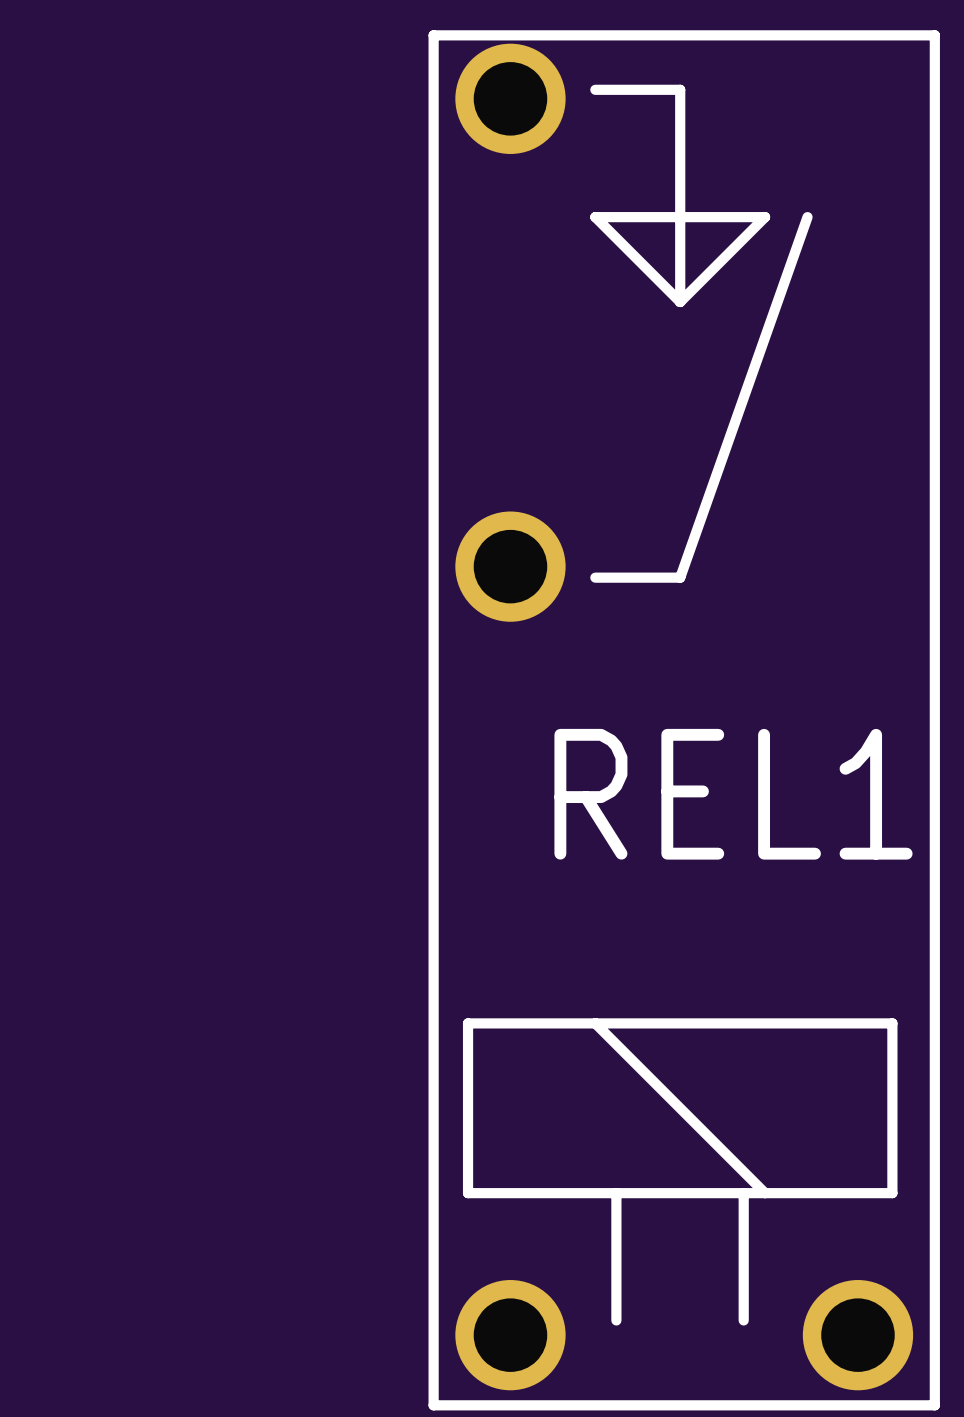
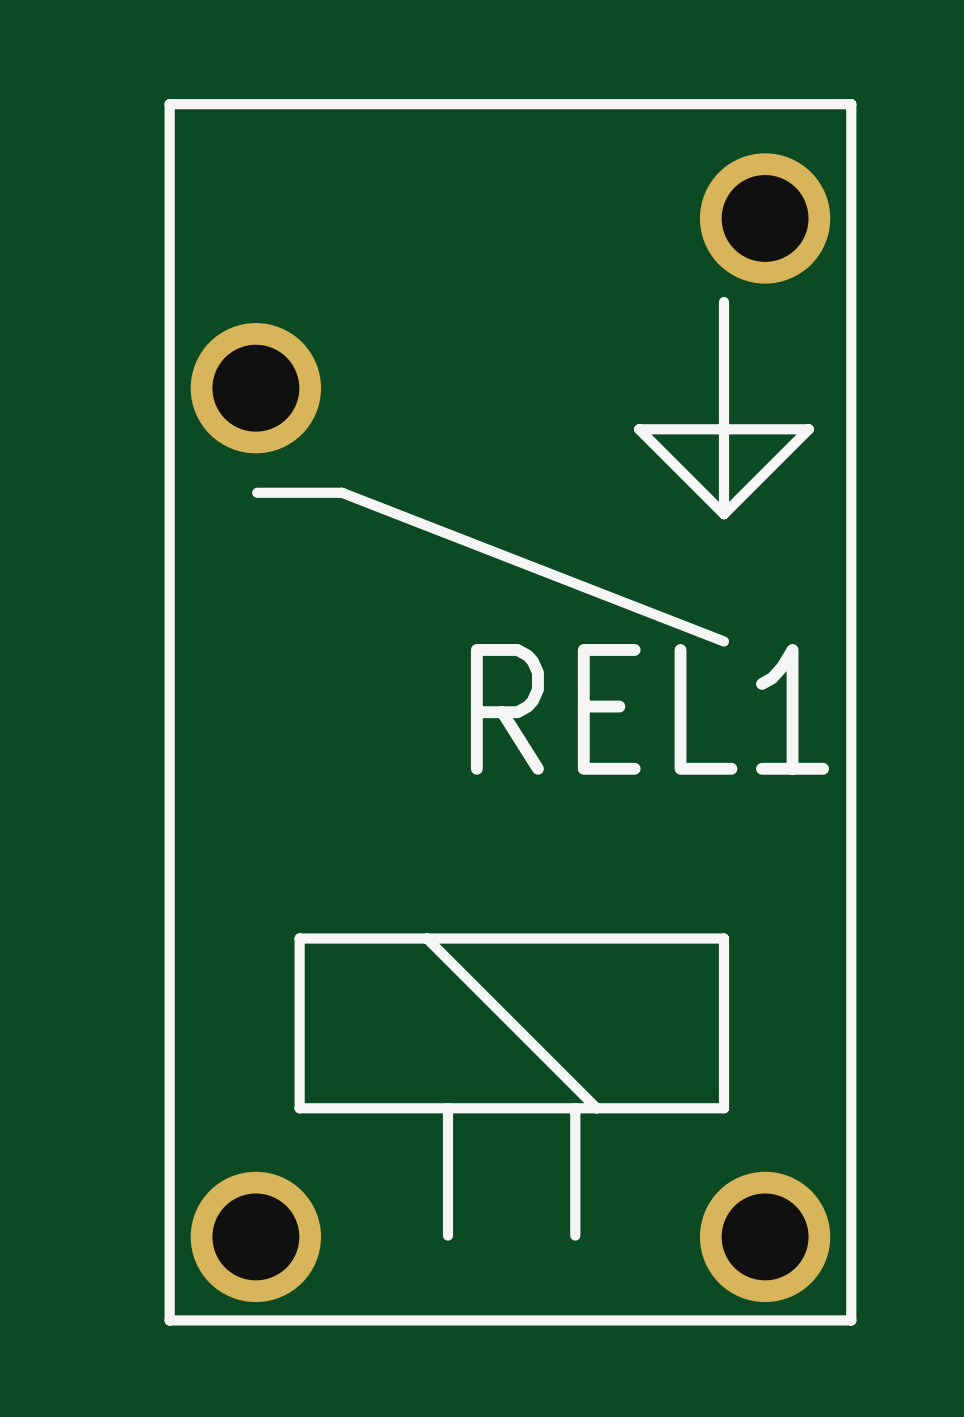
REL1 footprint: [428, 30, 940, 1411] -> [164, 99, 857, 1326]

